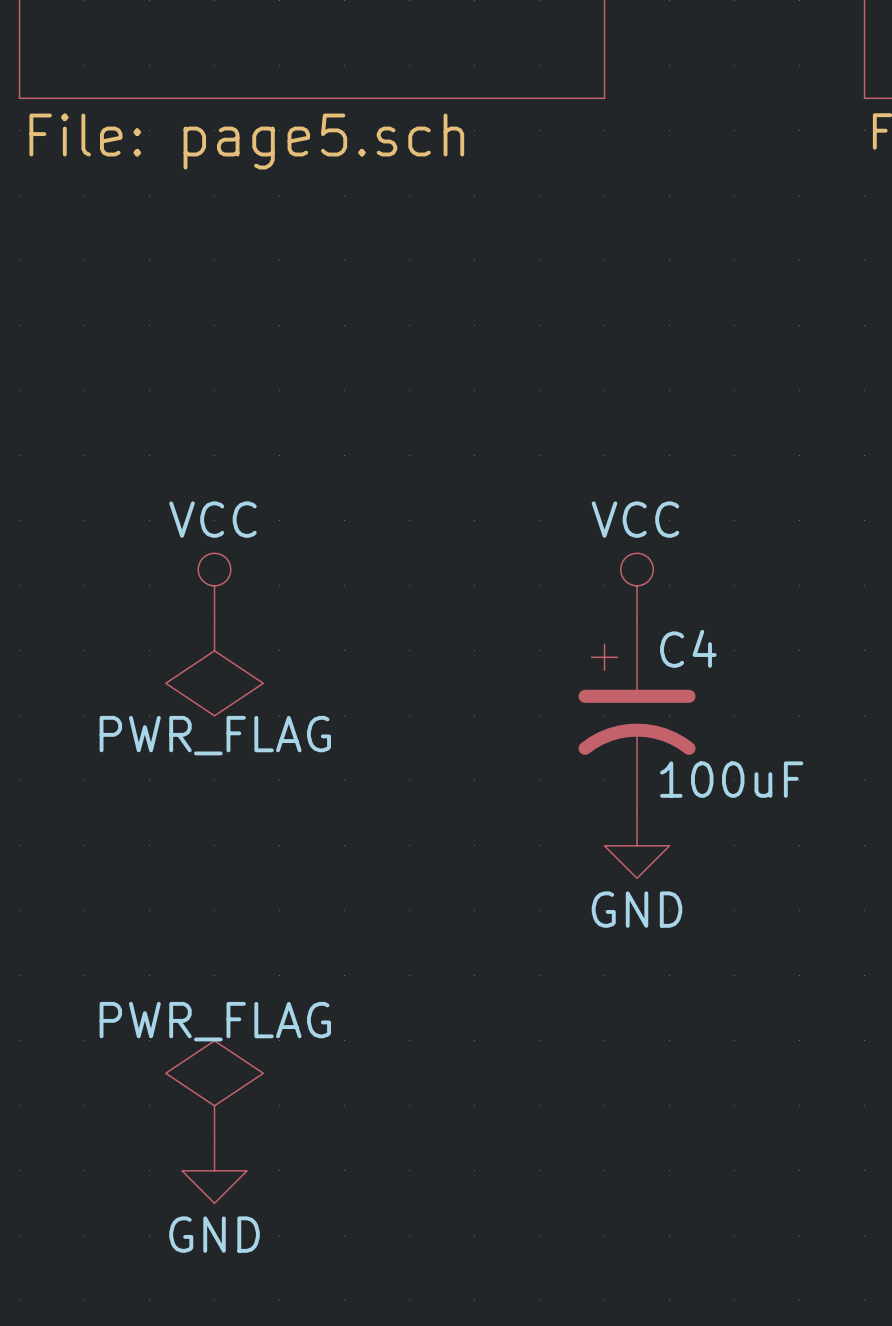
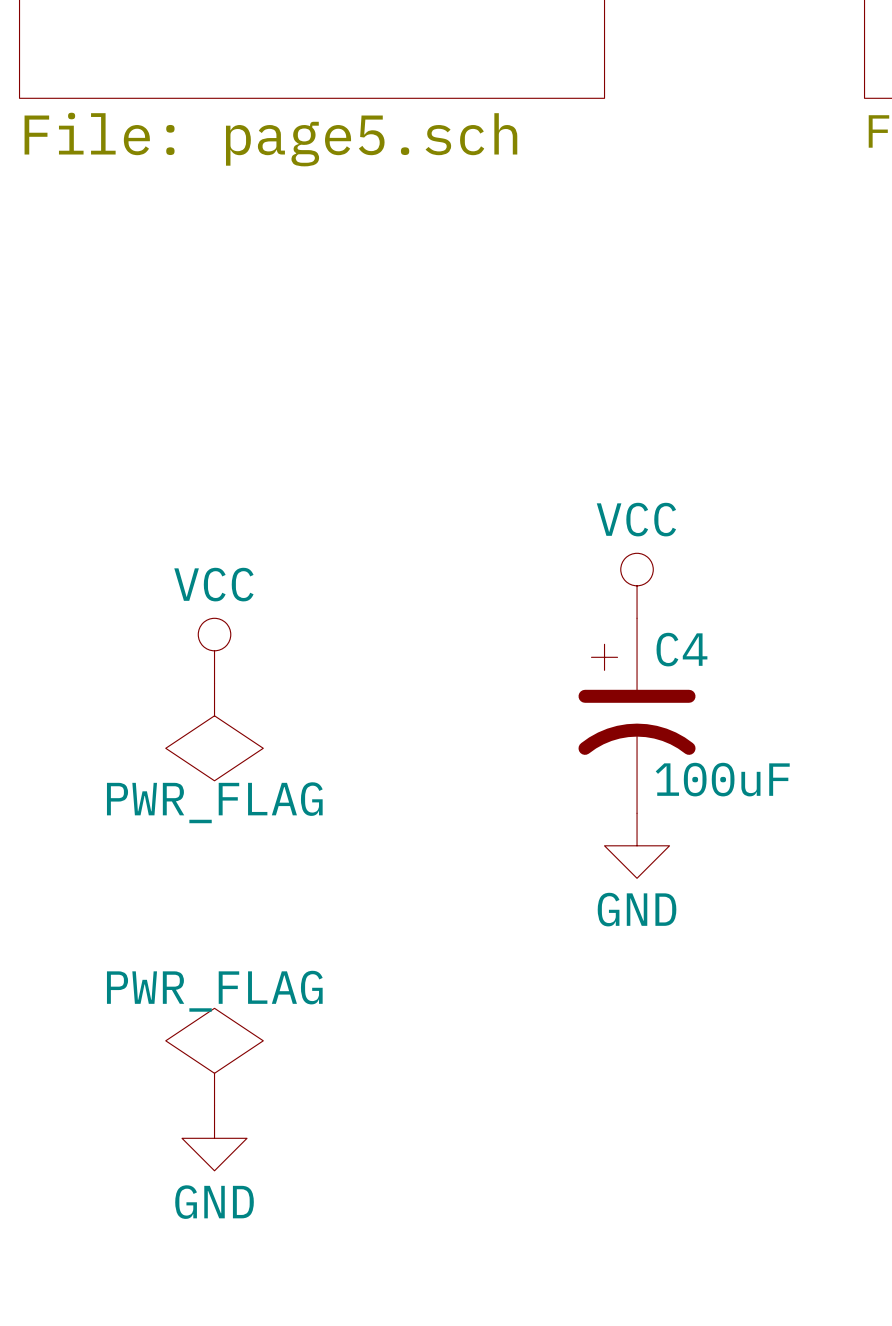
power symbol: VCC (214, 585) -> none
power symbol: PWR_FLAG (214, 667) -> VCC (214, 650)
power symbol: none -> PWR_FLAG (214, 732)
power symbol position: PWR_FLAG (214, 1089) -> PWR_FLAG (214, 1057)
power symbol position: GND (214, 1170) -> GND (214, 1138)

